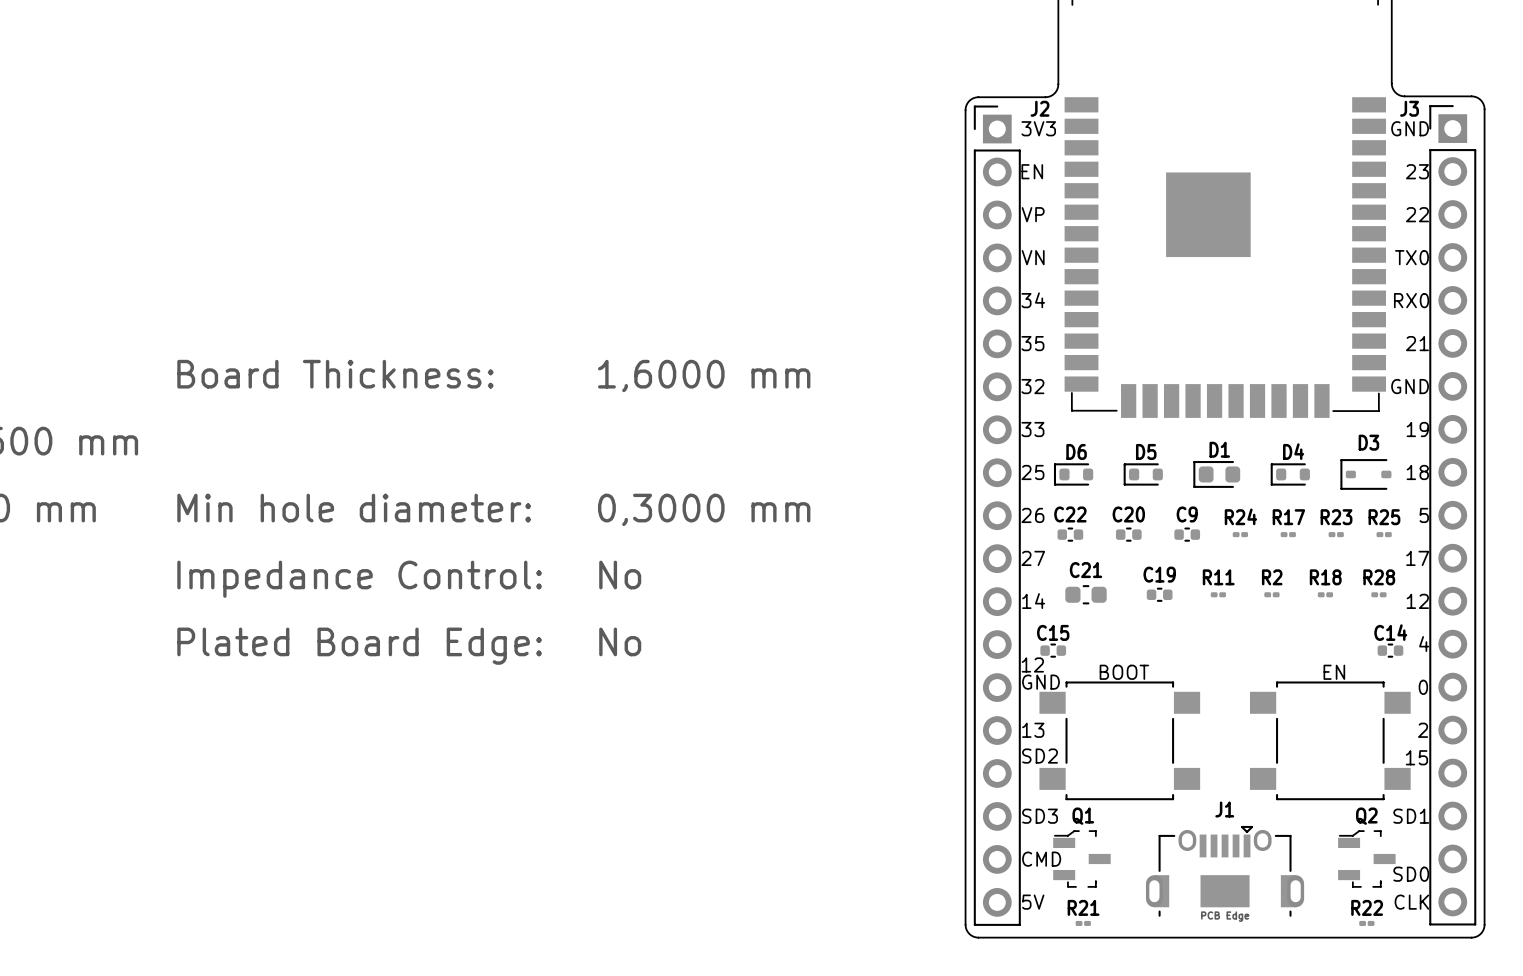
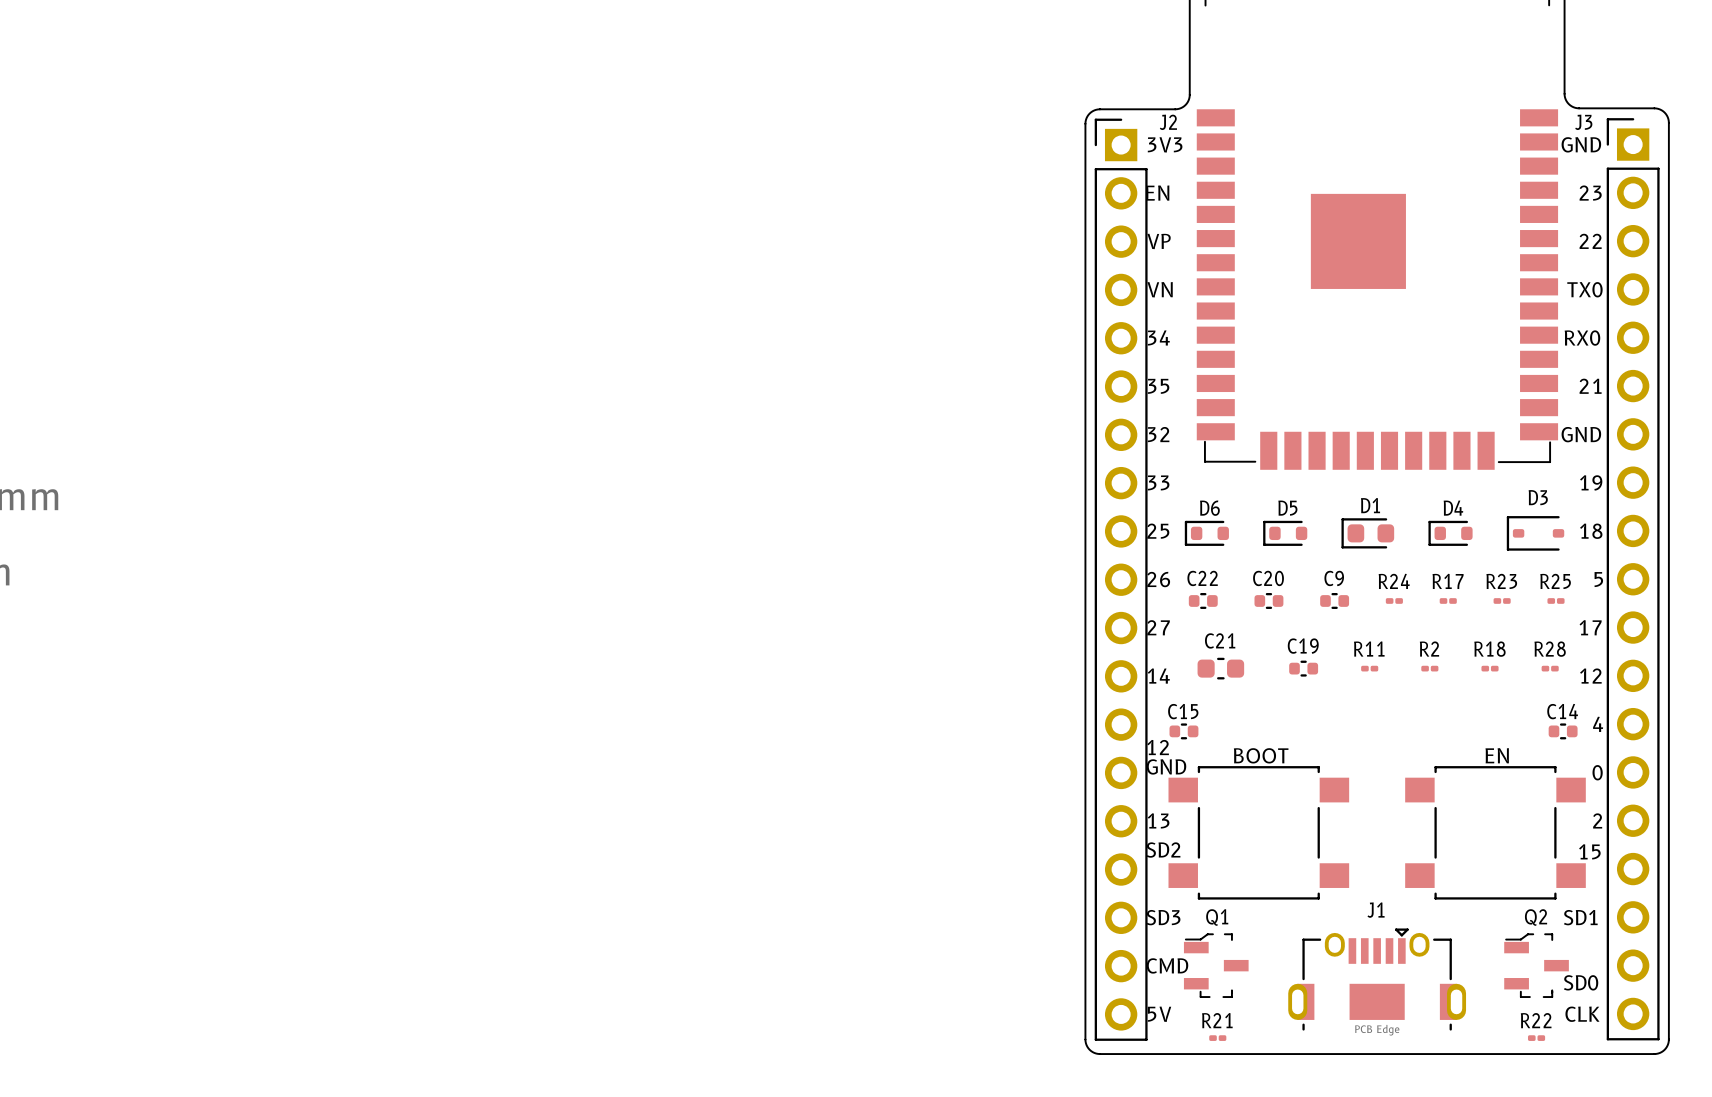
text: Board Thickness: (335, 374) -> none
text: 1,6000 mm (704, 376) -> none
text: Min hole diameter: (354, 508) -> none
text: 0,3000 mm (704, 509) -> none
text: No (620, 575) -> none
text: Impedance Control: (359, 579) -> none
text: No (620, 641) -> none
text: Plated Board Edge: (359, 646) -> none

